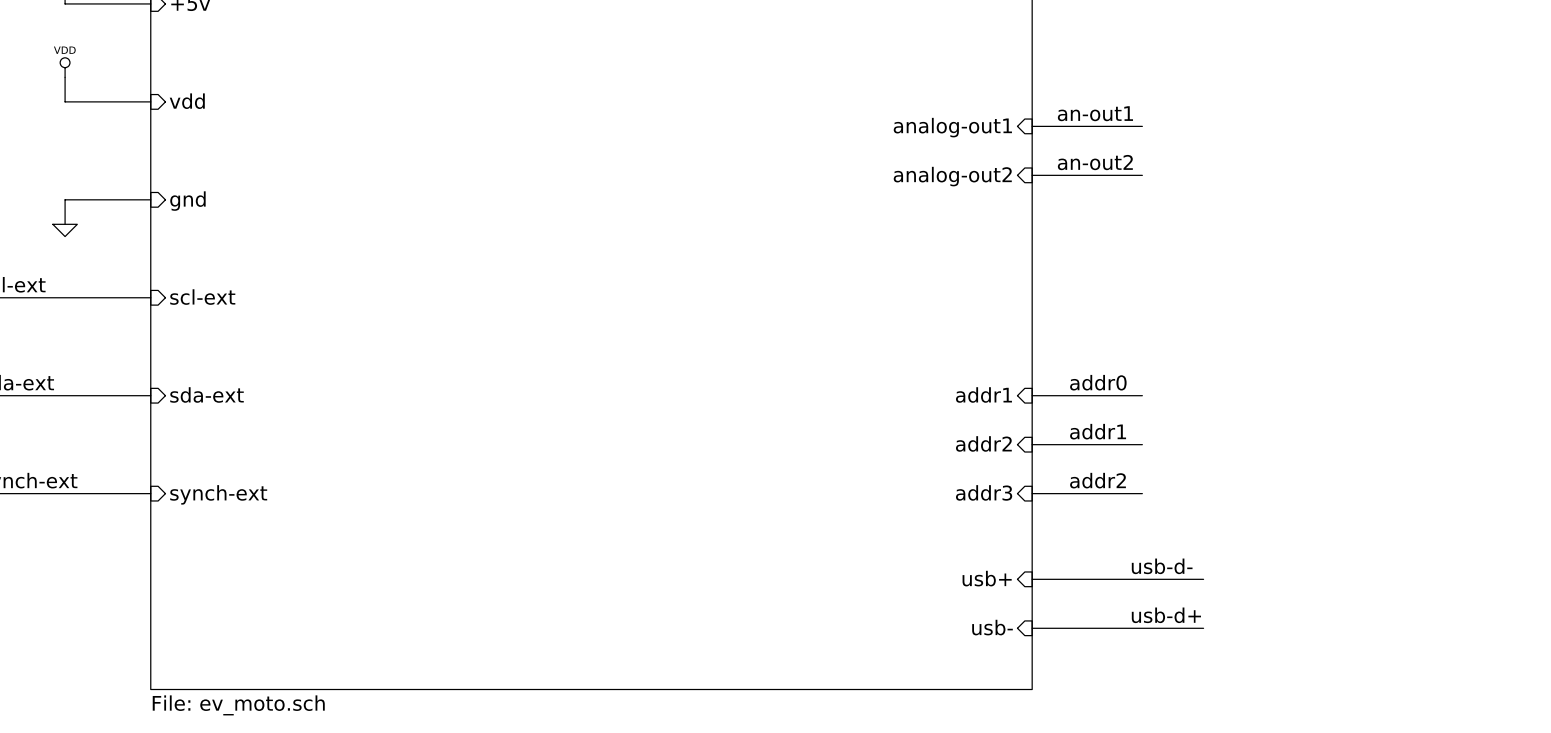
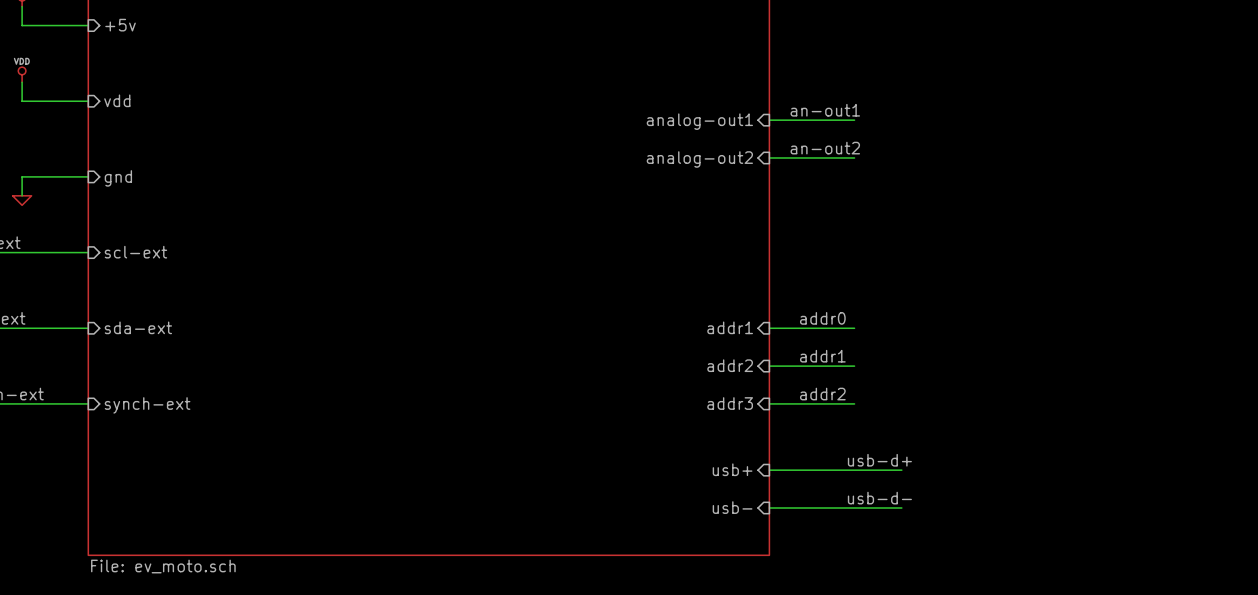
label: usb-d- (1162, 566) -> usb-d+ (879, 460)
label: usb-d+ (1166, 615) -> usb-d- (879, 498)

